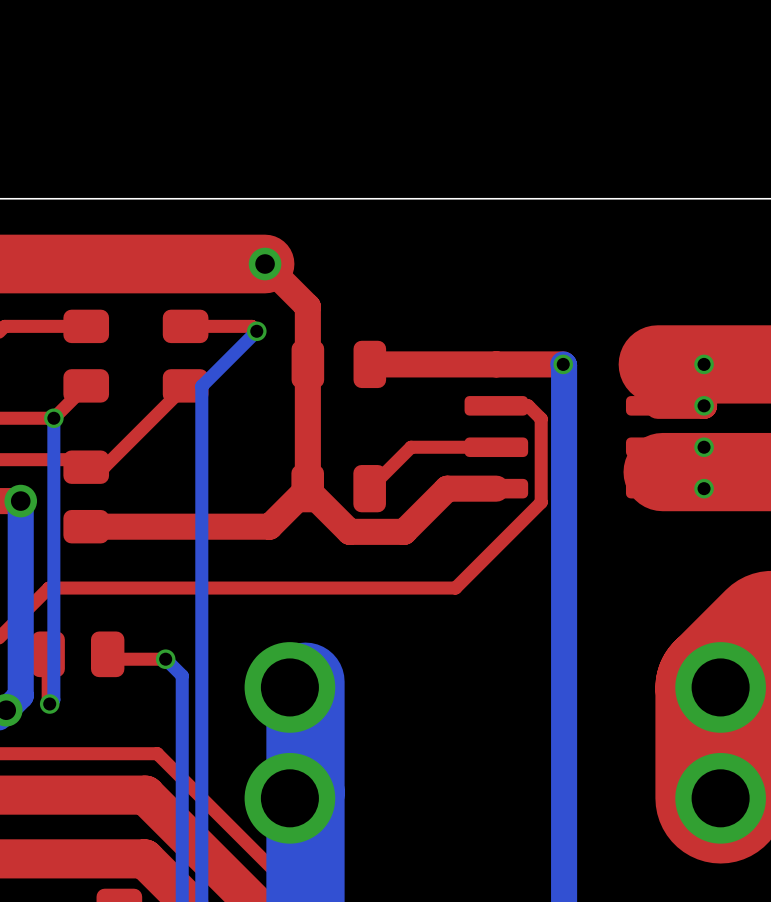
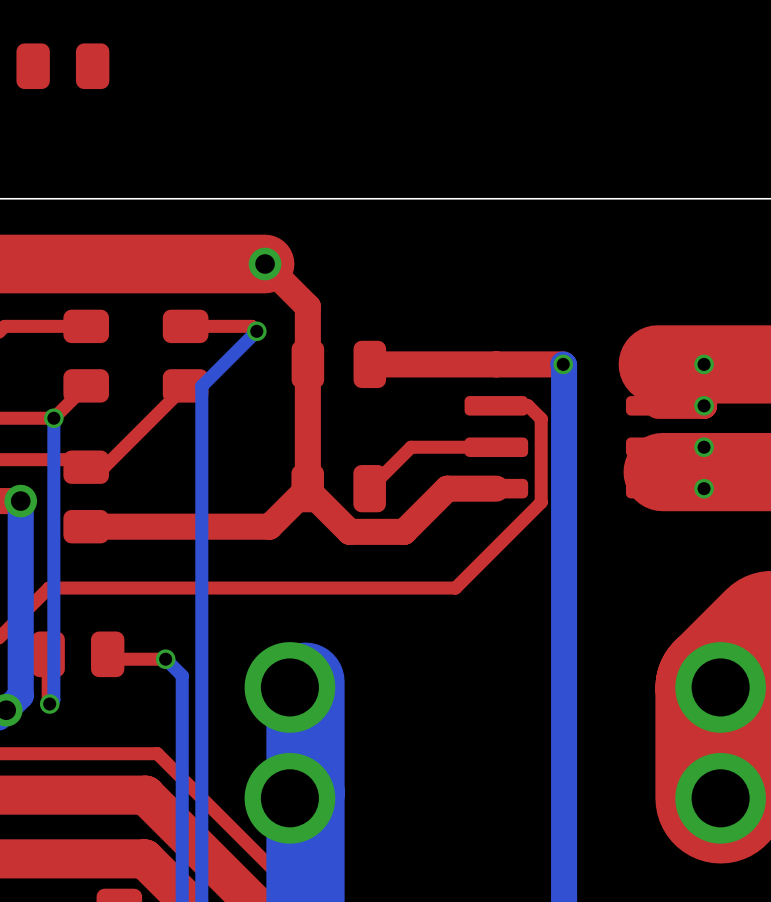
part: none -> (62, 66)

